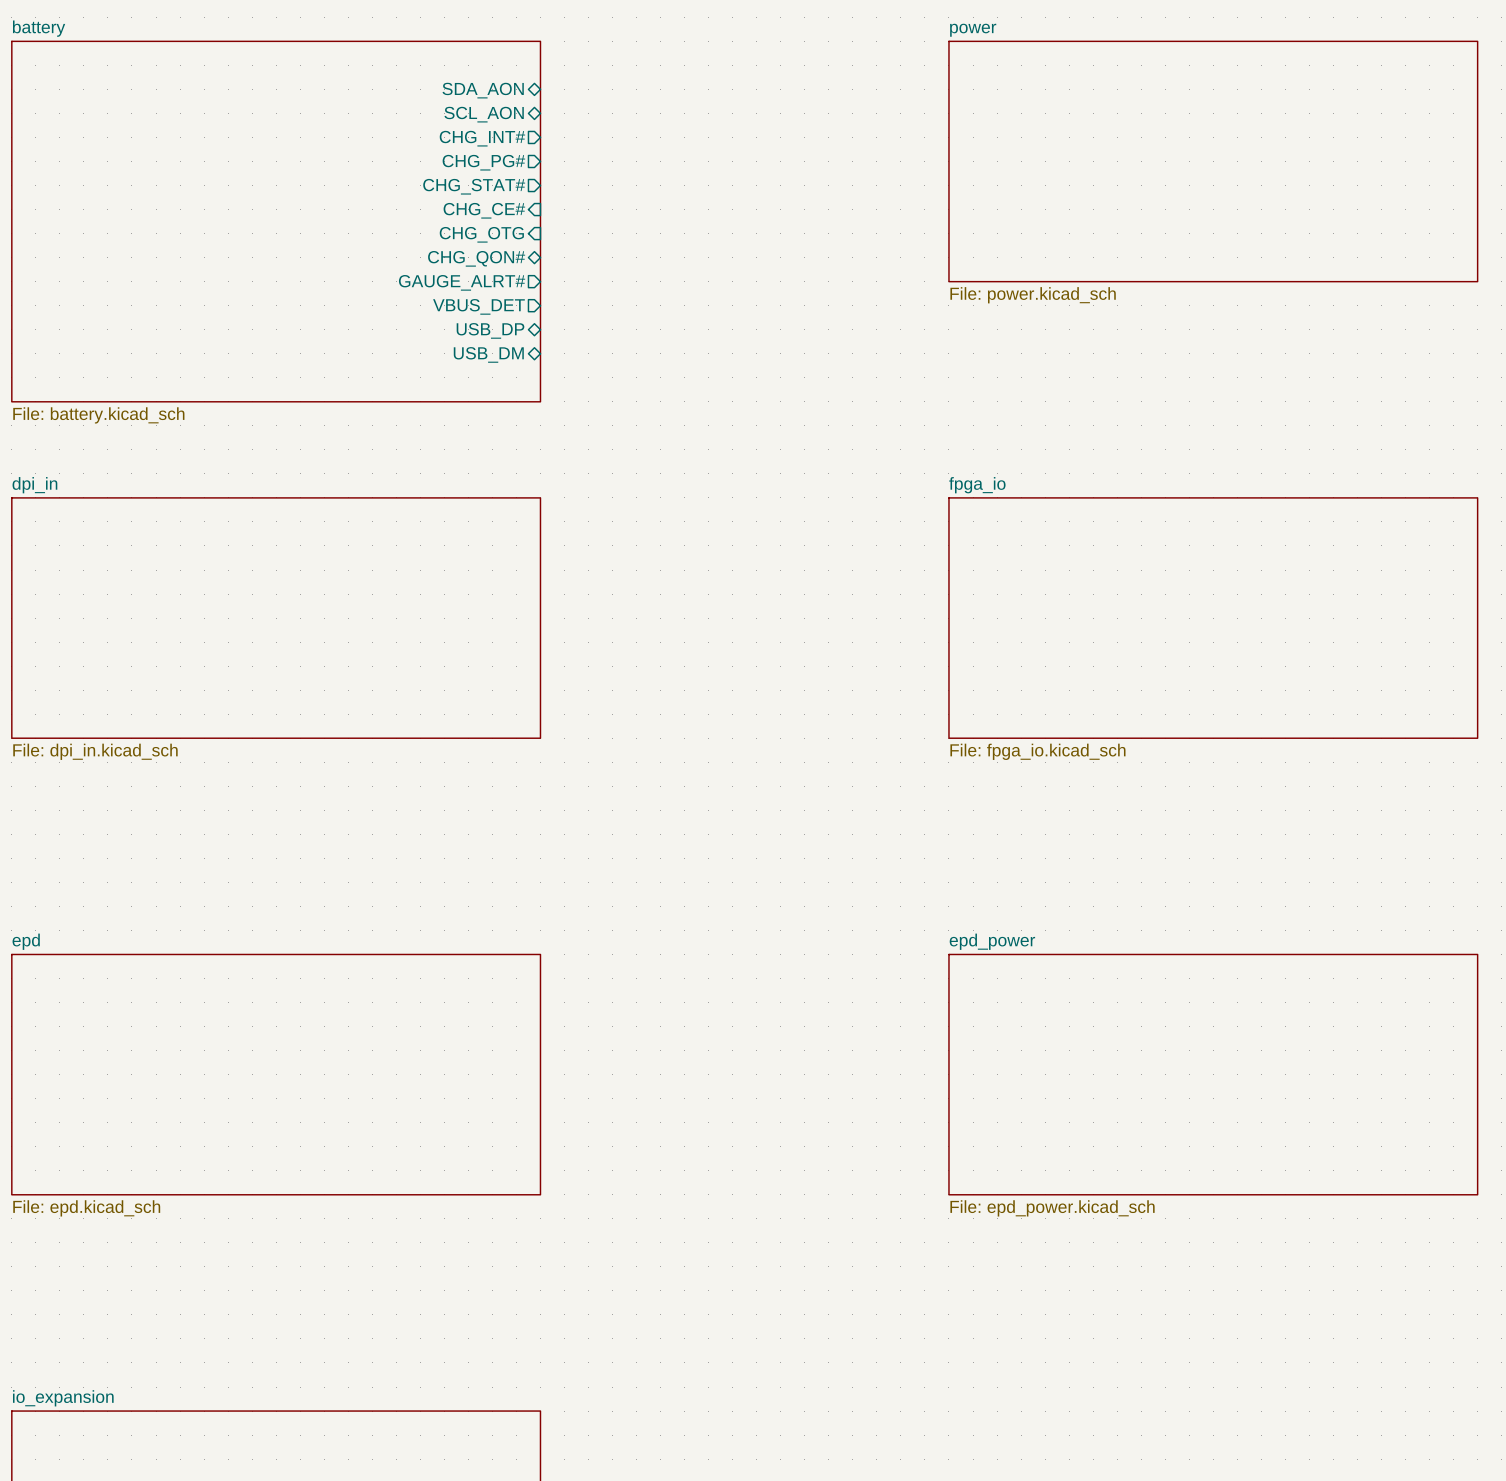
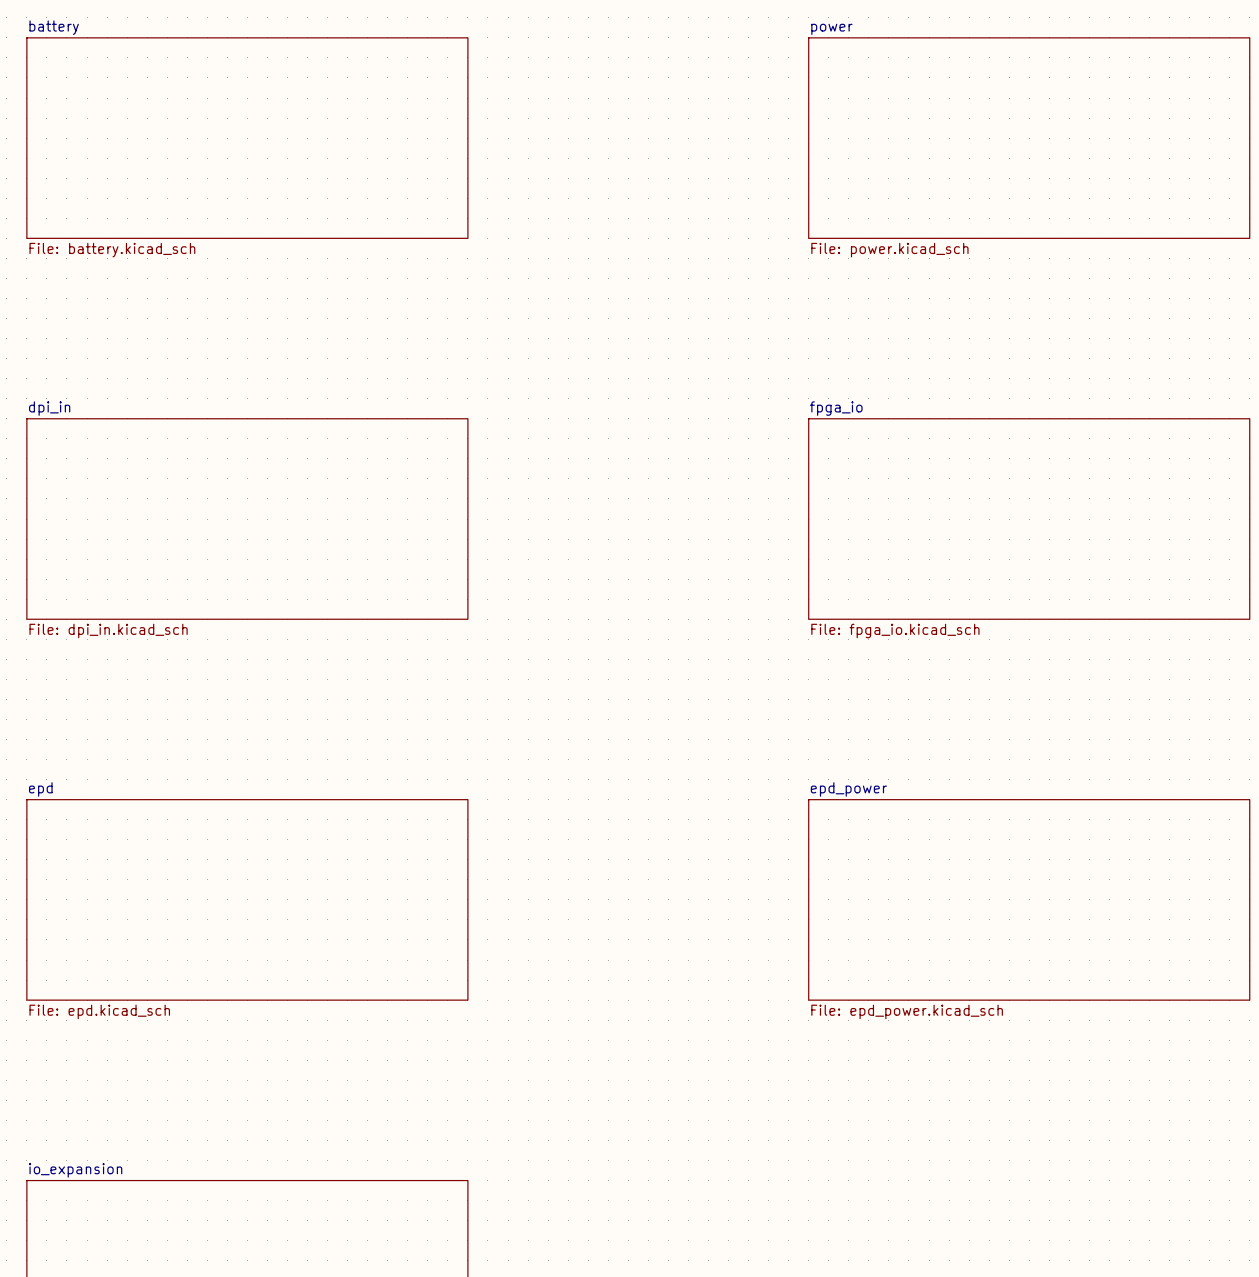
sheet pin: SDA_AON (483, 90) -> none
sheet pin: SCL_AON (484, 114) -> none
sheet pin: CHG_INT# (482, 138) -> none
sheet battery: none -> File: battery.kicad_sch (247, 138)
sheet pin: CHG_PG# (483, 162) -> none
sheet pin: CHG_STAT# (474, 186) -> none
sheet pin: CHG_CE# (484, 210) -> none
sheet battery: File: battery.kicad_sch (276, 221) -> none
sheet pin: CHG_OTG (481, 234) -> none
sheet pin: CHG_QON# (476, 258) -> none
sheet pin: GAUGE_ALRT# (462, 282) -> none
sheet pin: VBUS_DET (478, 306) -> none
sheet pin: USB_DP (490, 330) -> none
sheet pin: USB_DM (488, 354) -> none

